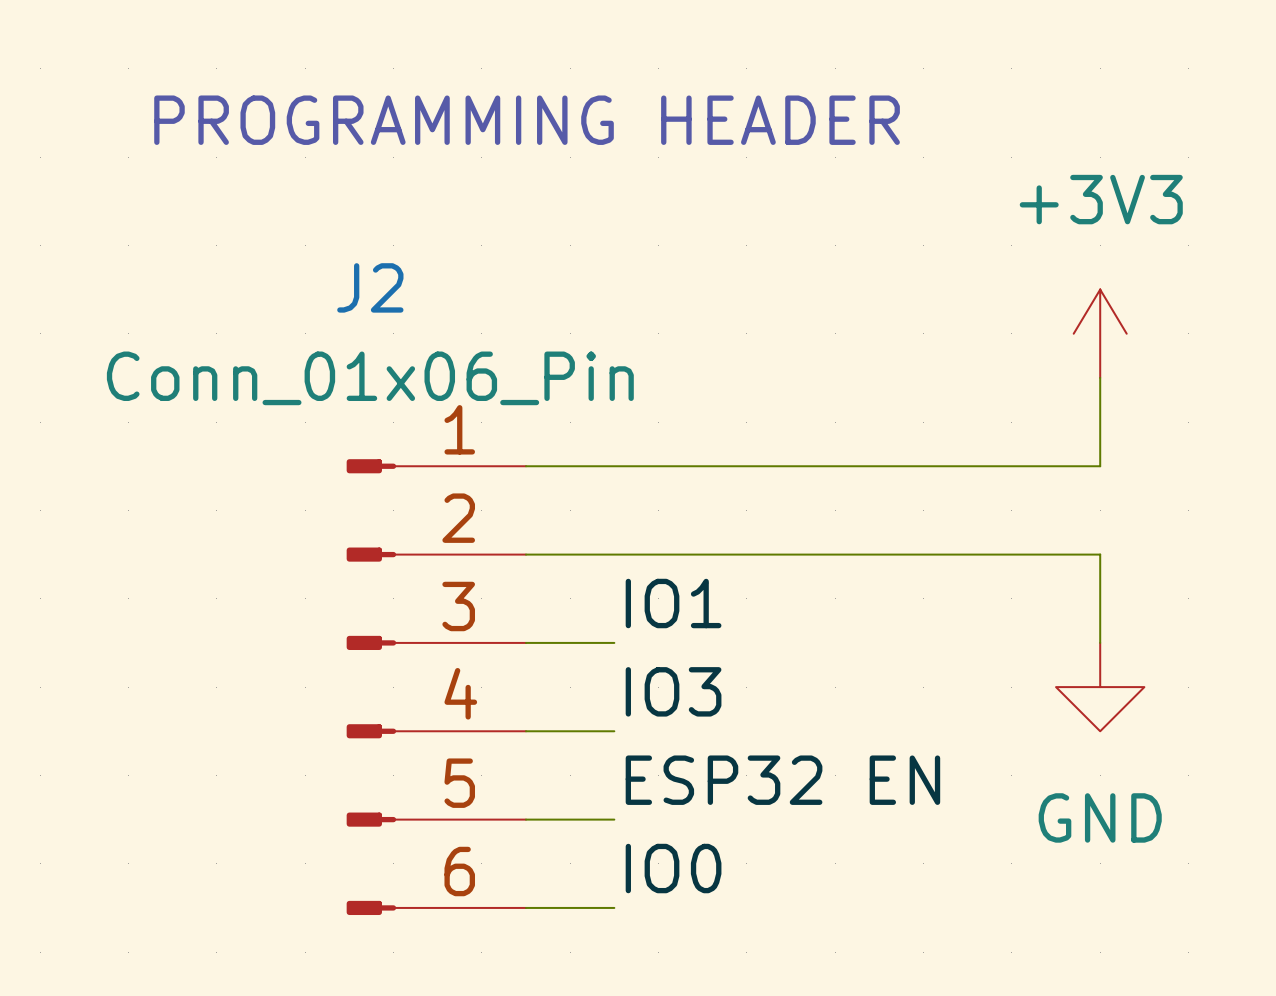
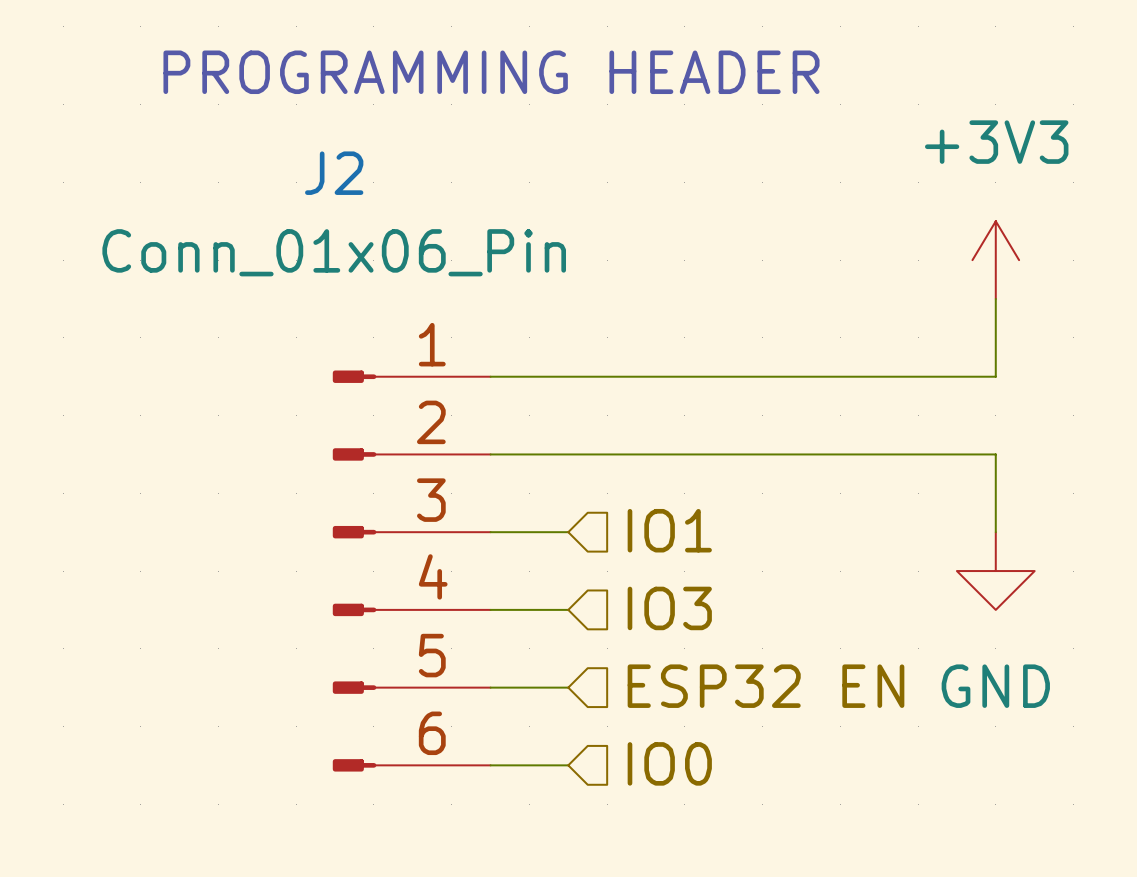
J2 name position: J2 (370, 287) -> J2 (334, 173)
J2 value position: Conn_01x06_Pin (370, 378) -> Conn_01x06_Pin (334, 252)
label: IO1 (673, 603) -> none
hierarchical label: none -> IO1 (669, 530)
label: IO3 (673, 691) -> none
hierarchical label: none -> IO3 (669, 608)
label: ESP32 EN (782, 780) -> none
hierarchical label: none -> ESP32 EN (765, 686)
label: IO0 (673, 868) -> none
hierarchical label: none -> IO0 (669, 763)

